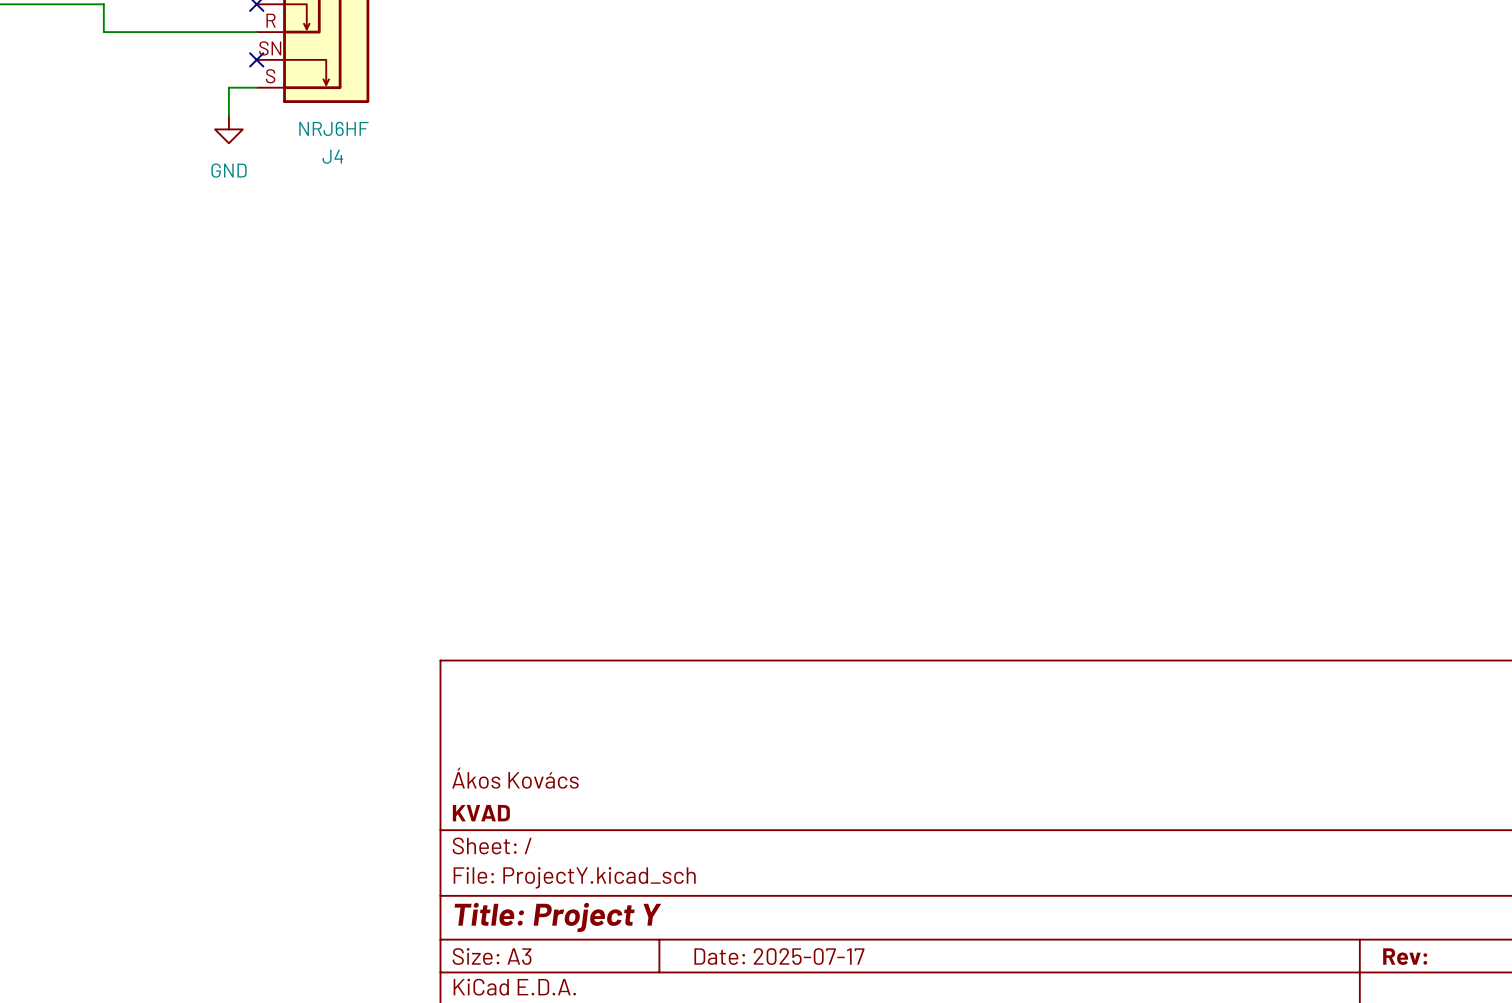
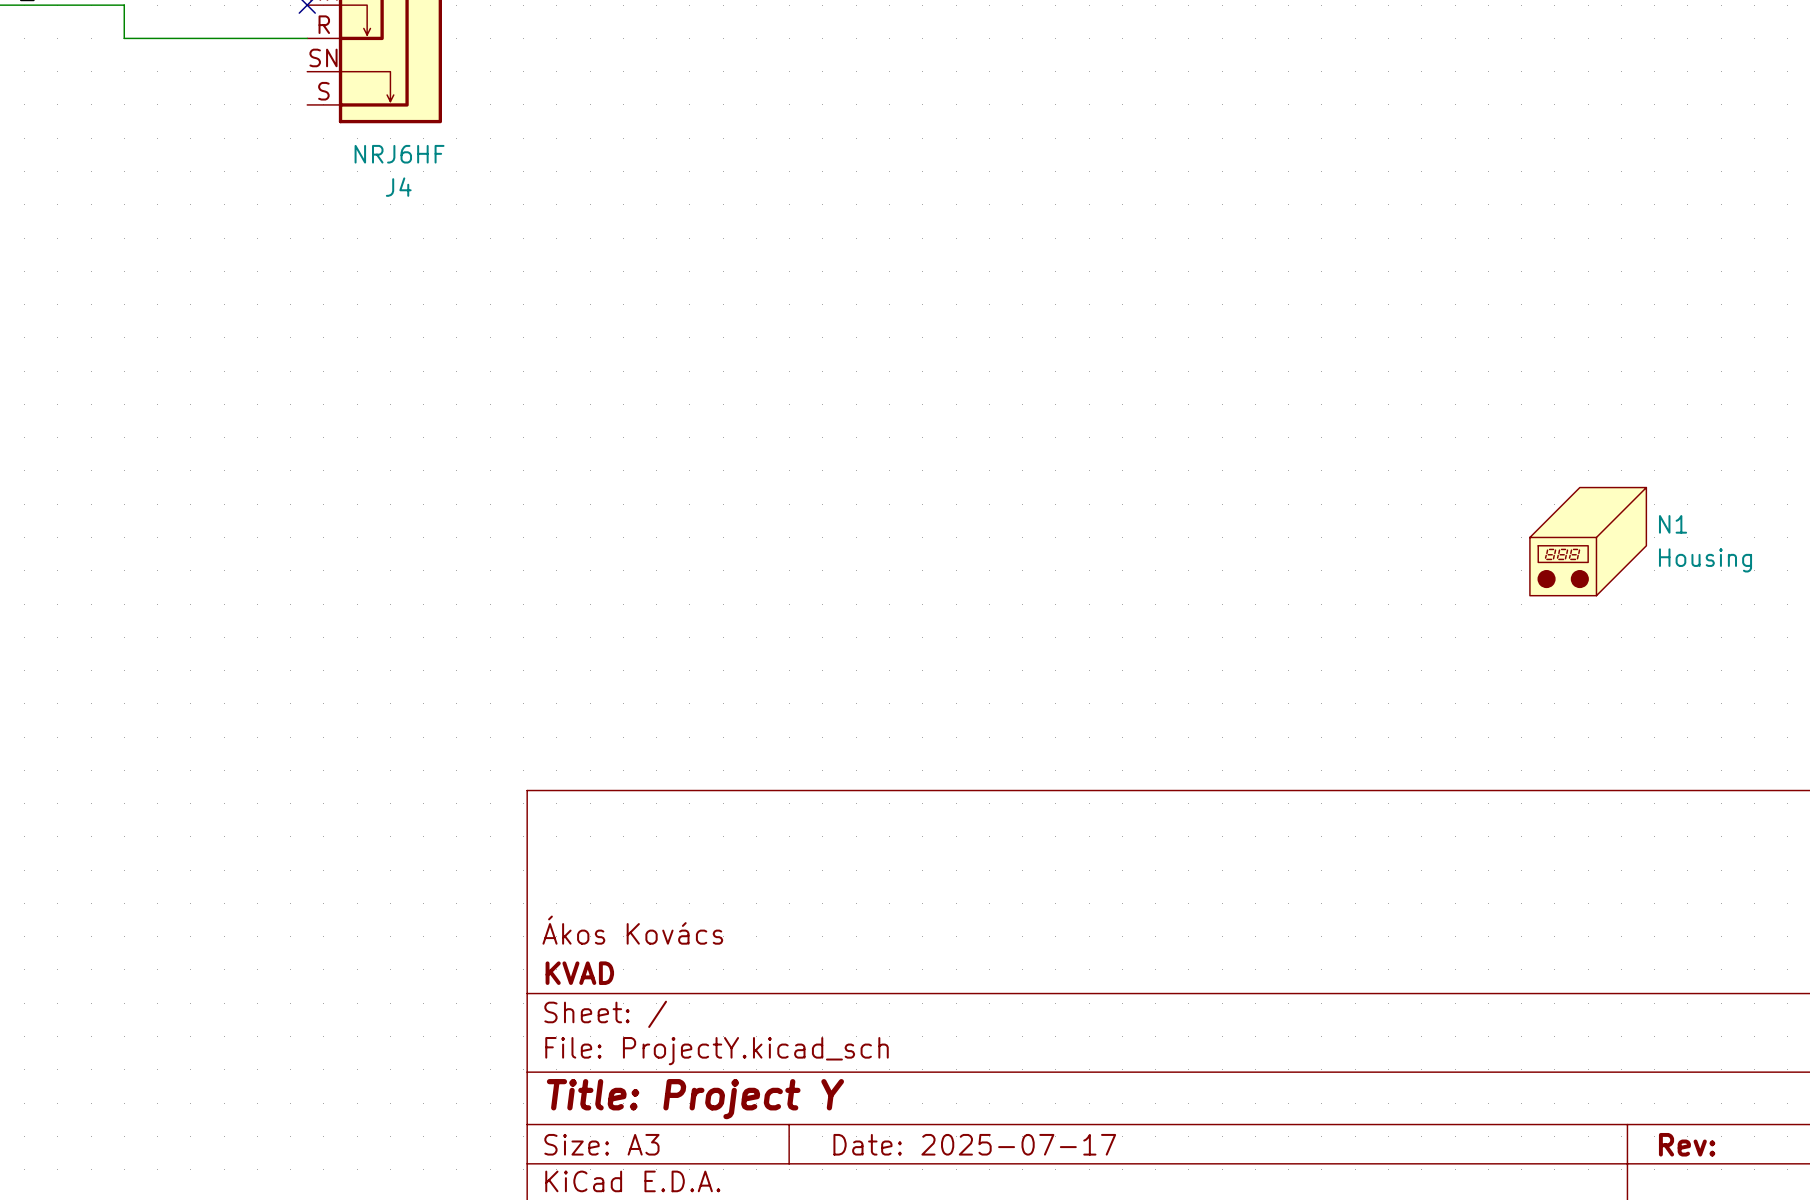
no-connect mark: (256, 59) -> none
wire: (256, 87) (228, 87) (228, 115) -> none
power symbol: GND (228, 129) -> none
N1: none -> Housing (1588, 541)

